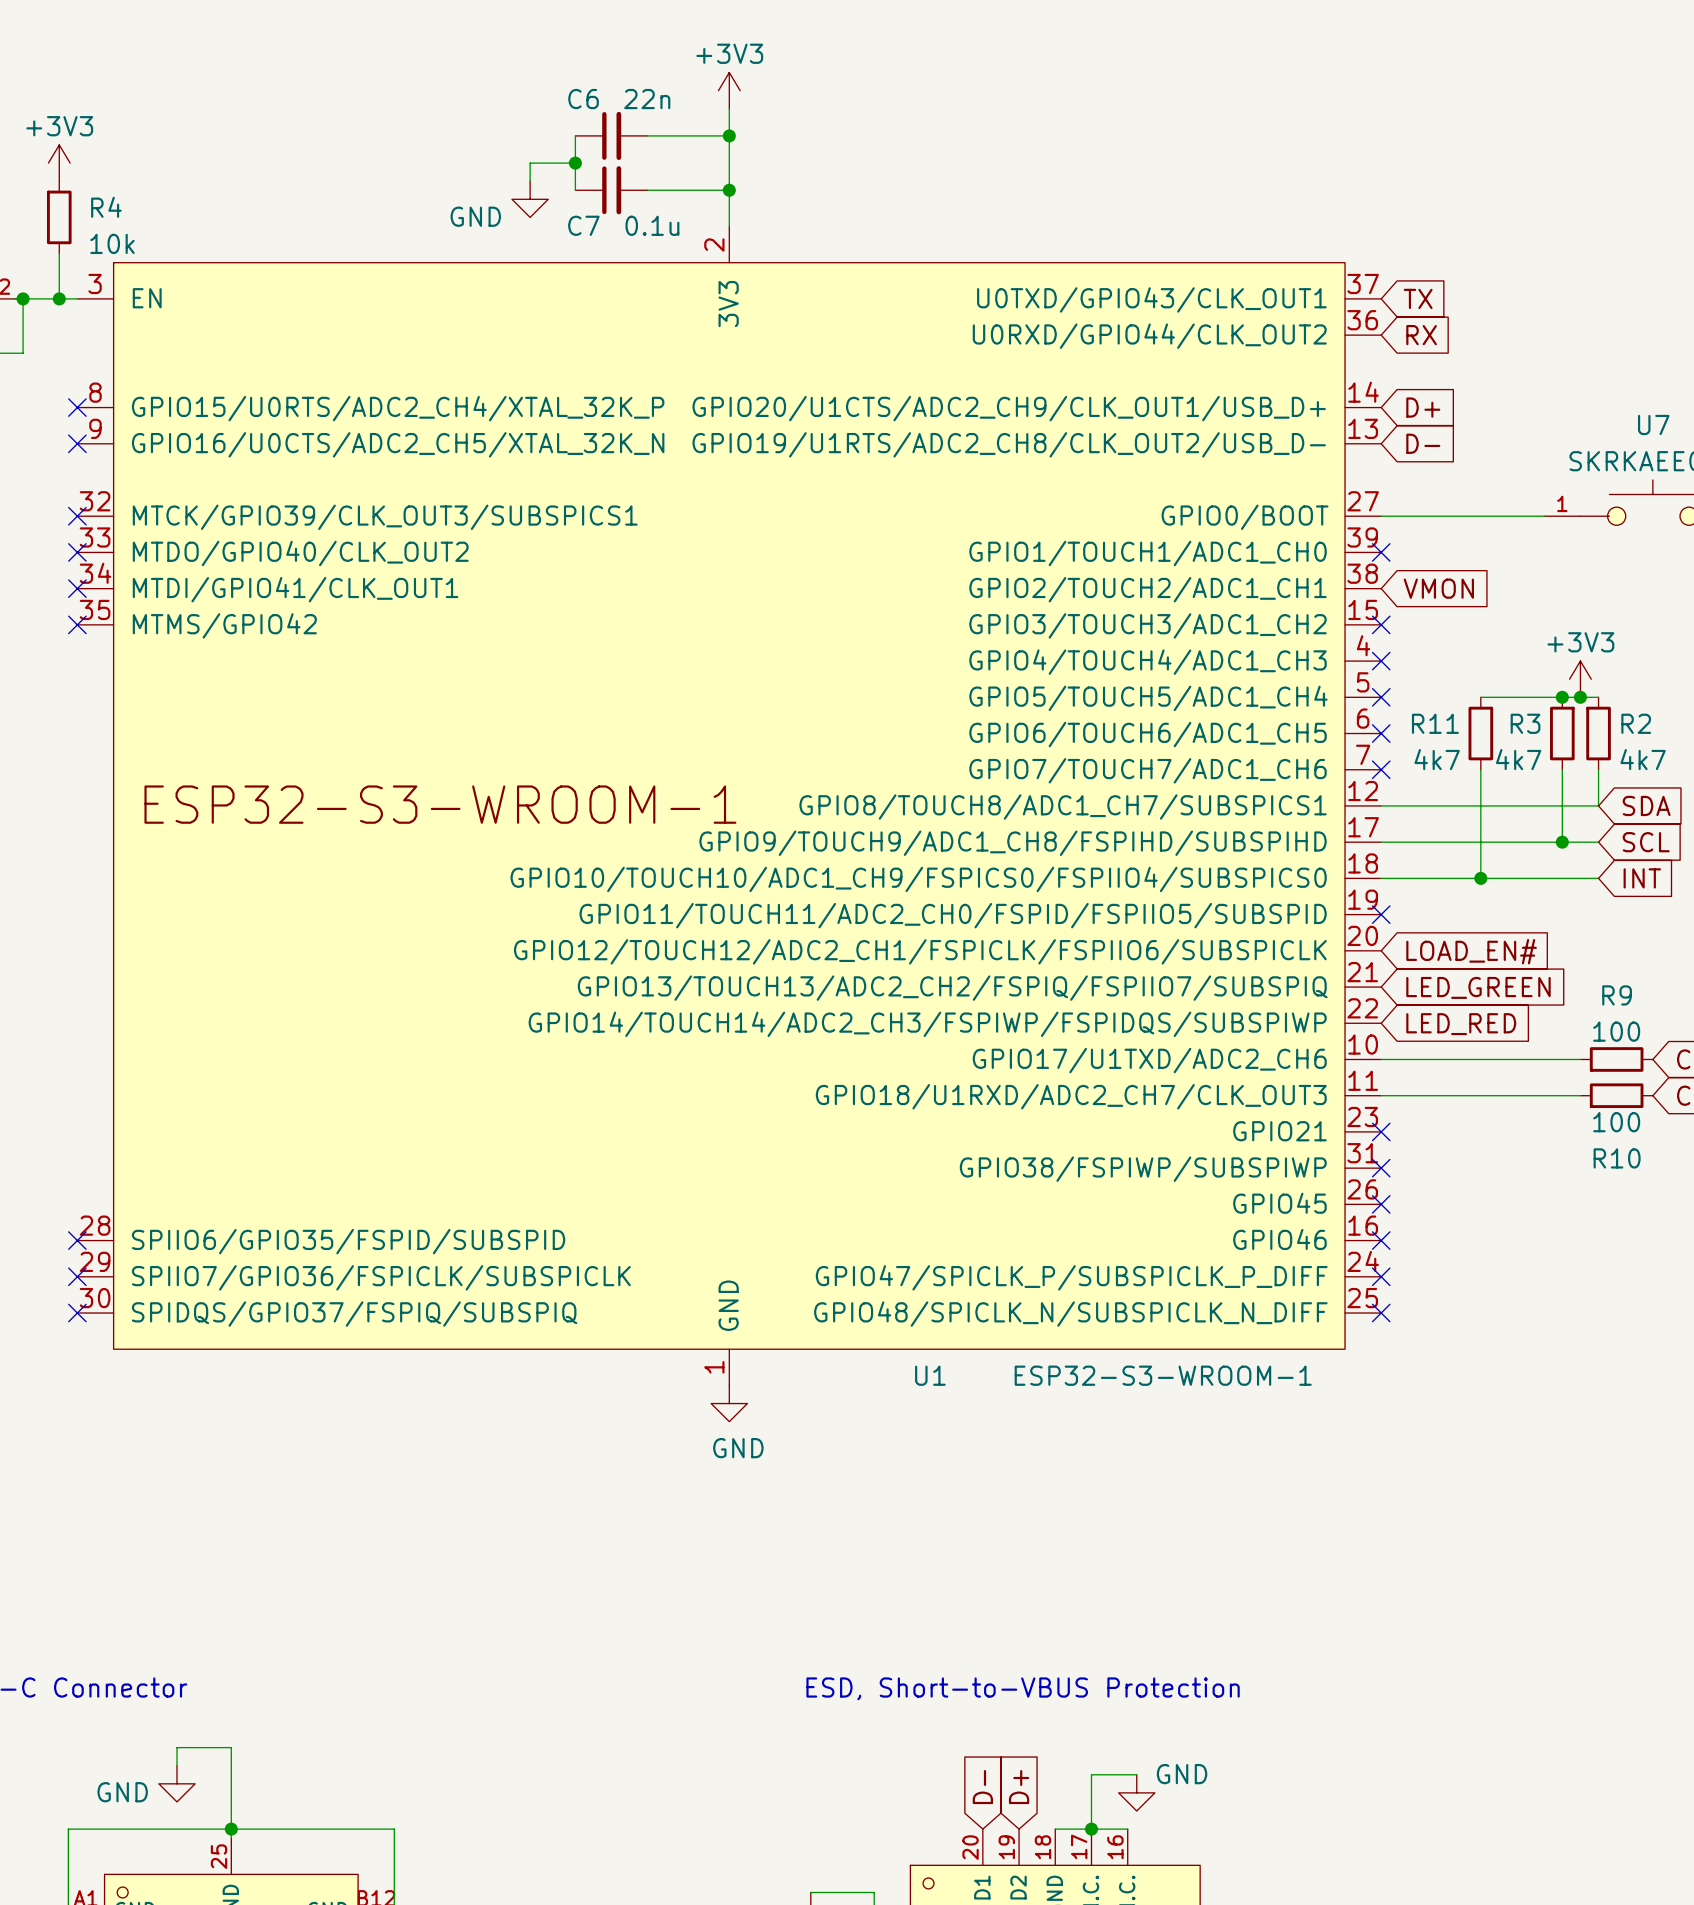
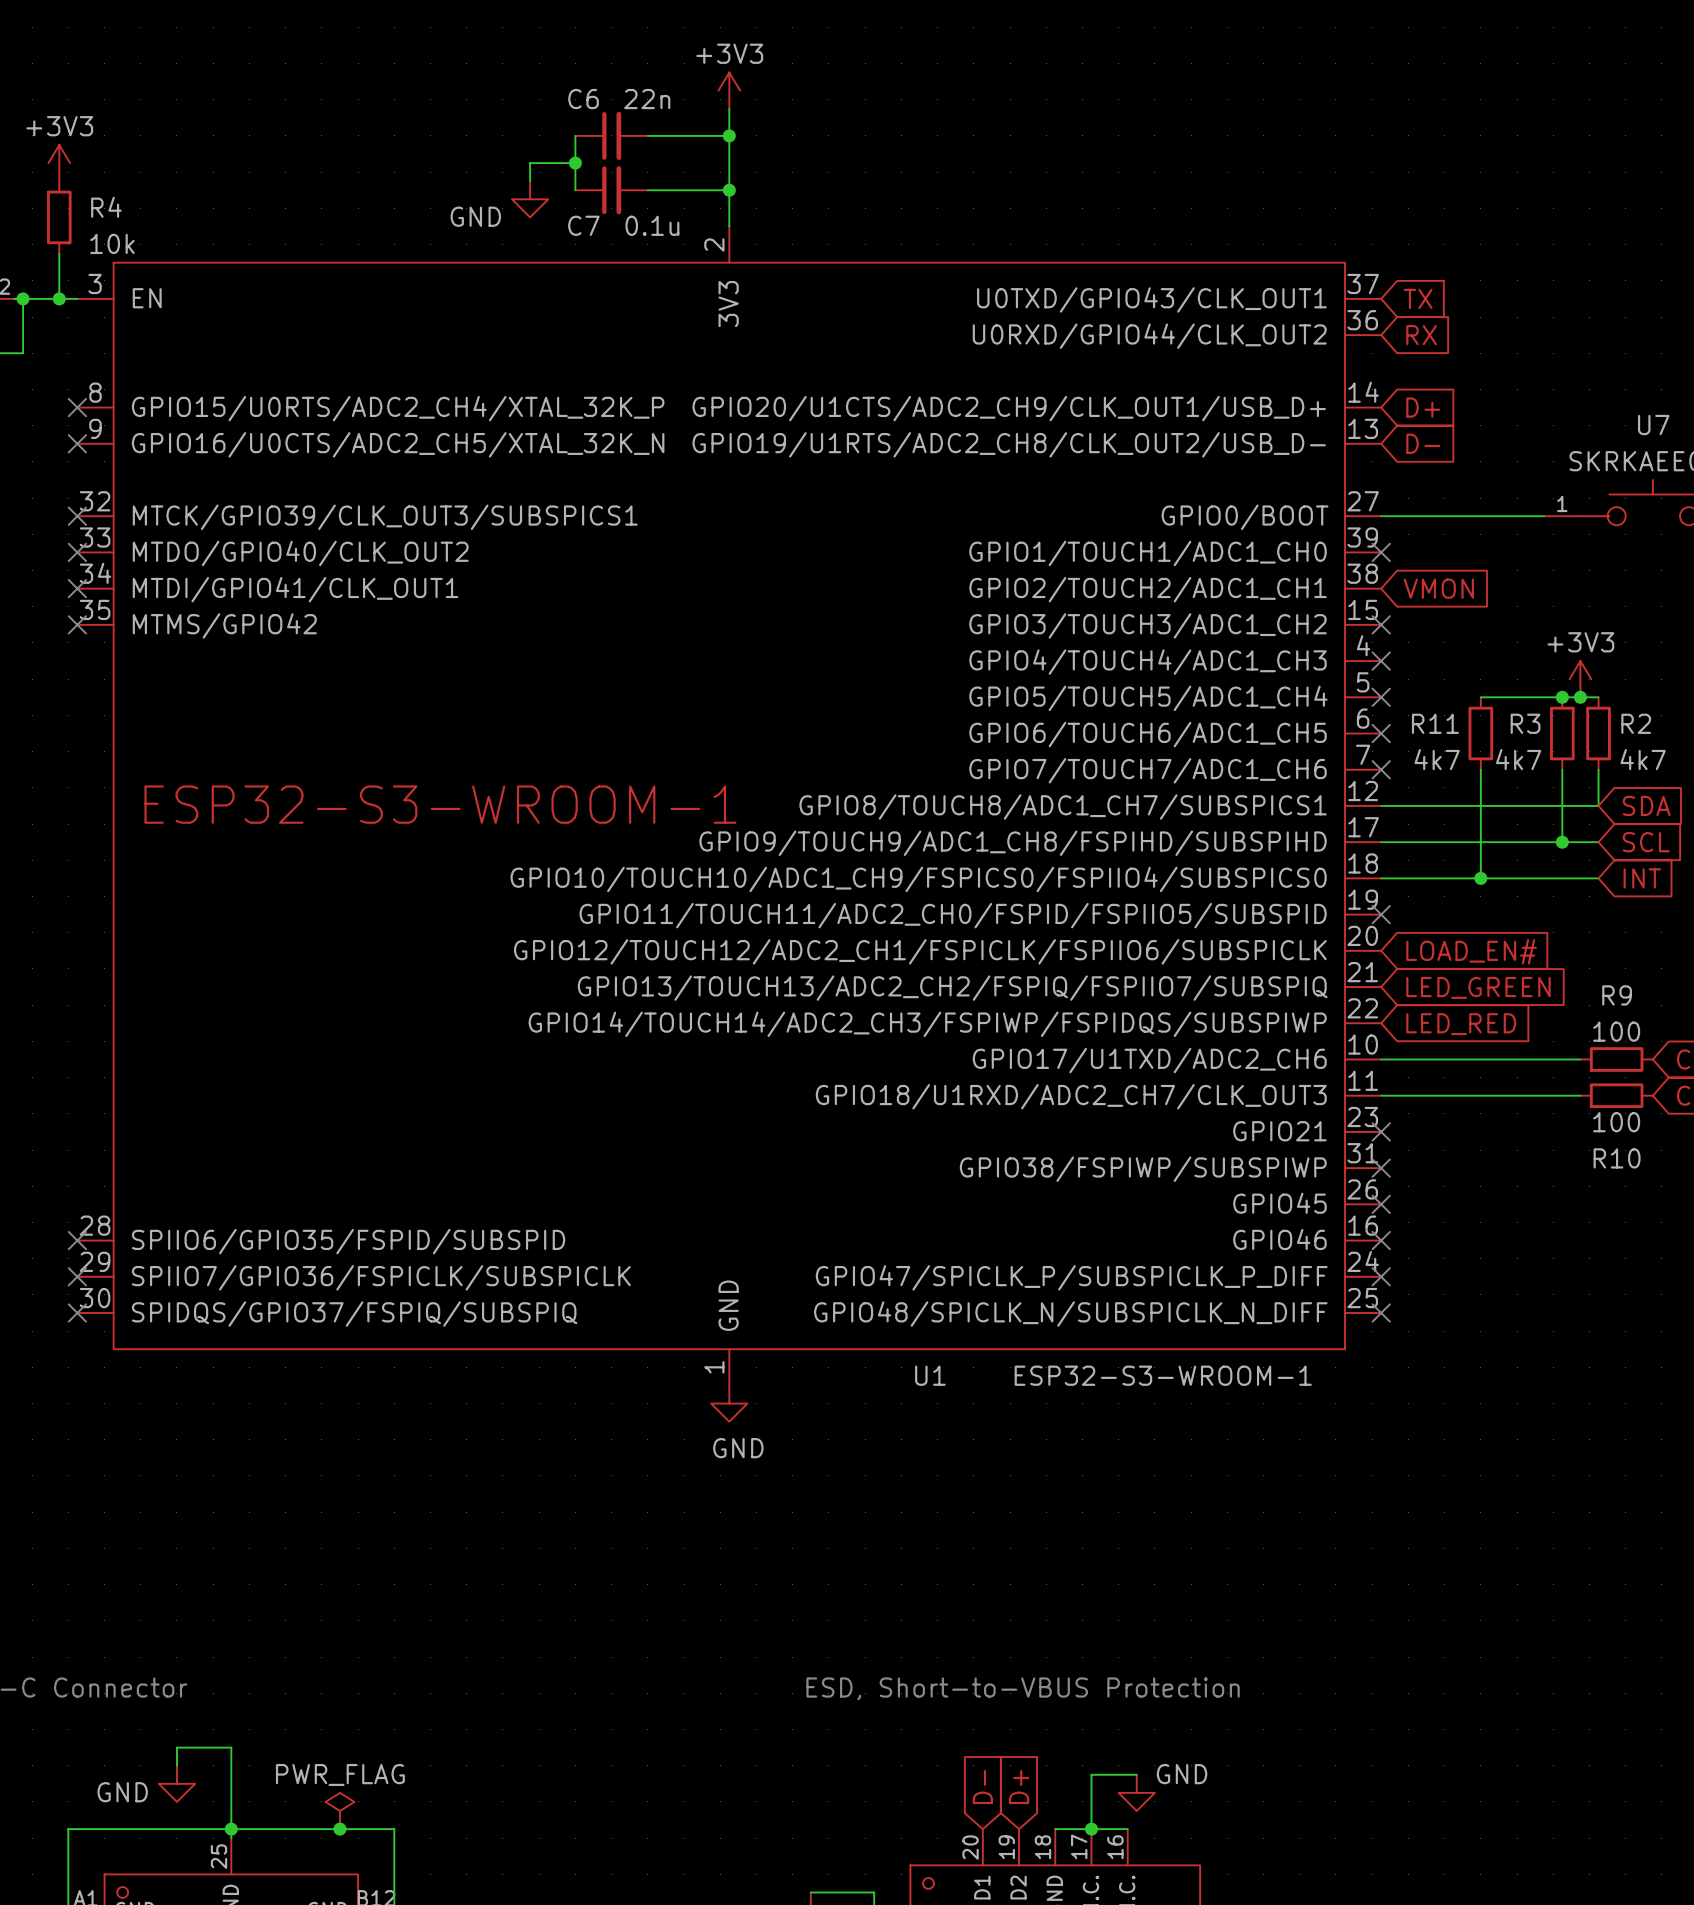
power symbol: none -> PWR_FLAG (339, 1811)
junction: none -> (339, 1829)

